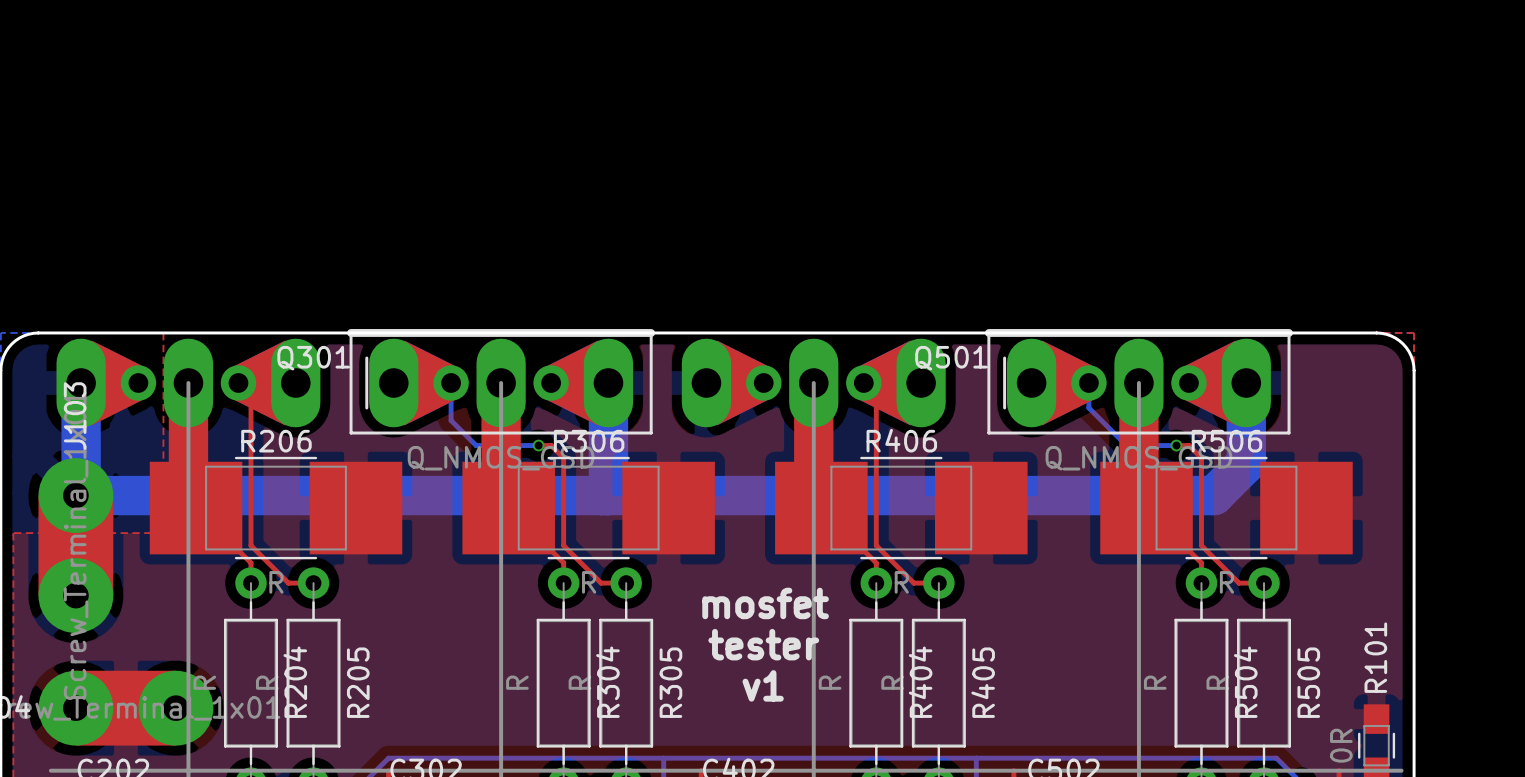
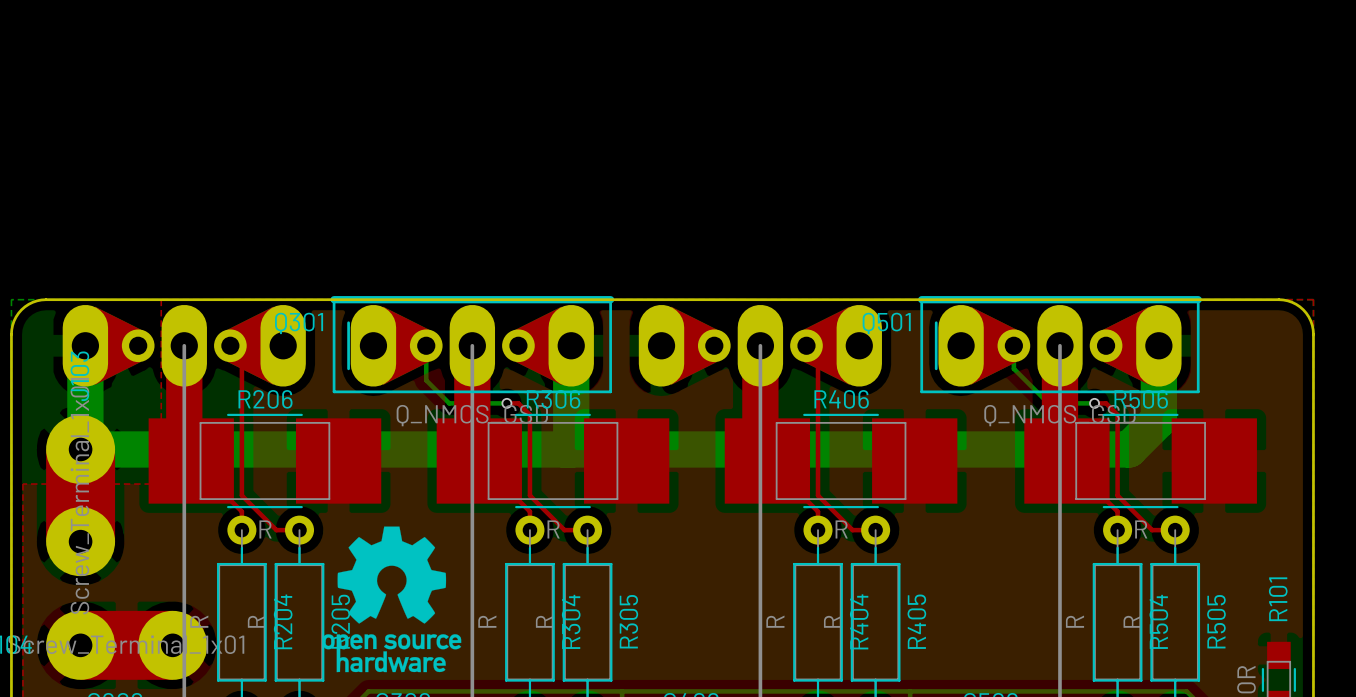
drawing: none -> [322, 526, 462, 673]
text: mosfet (765, 603) -> none
text: tester (763, 644) -> none
text: v1 (763, 685) -> none

